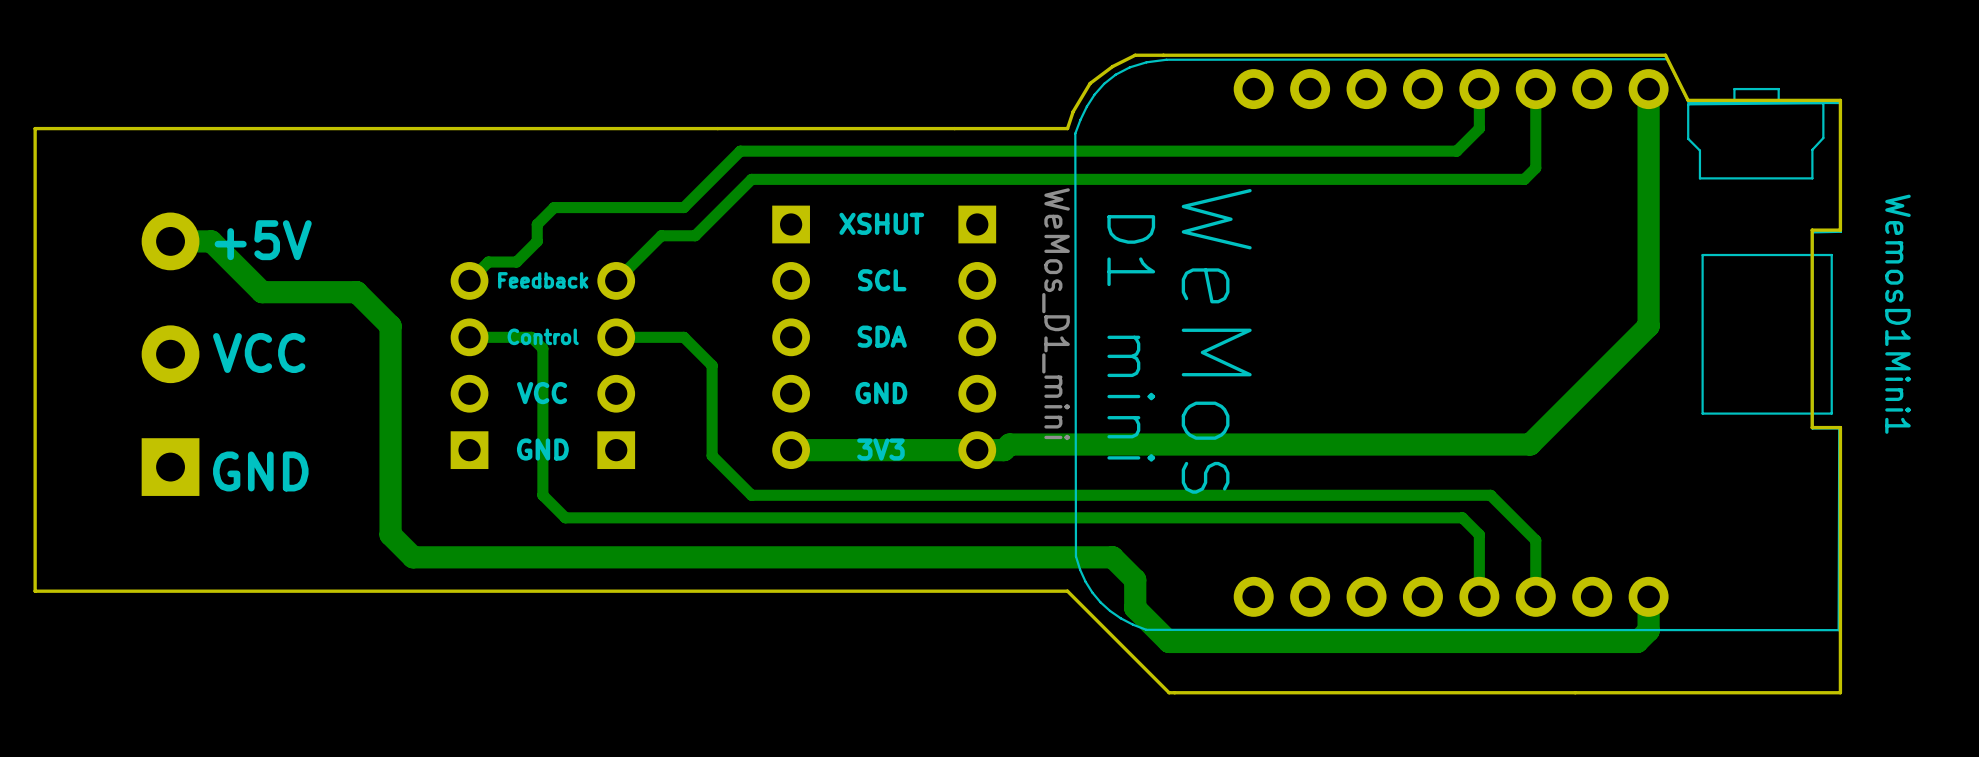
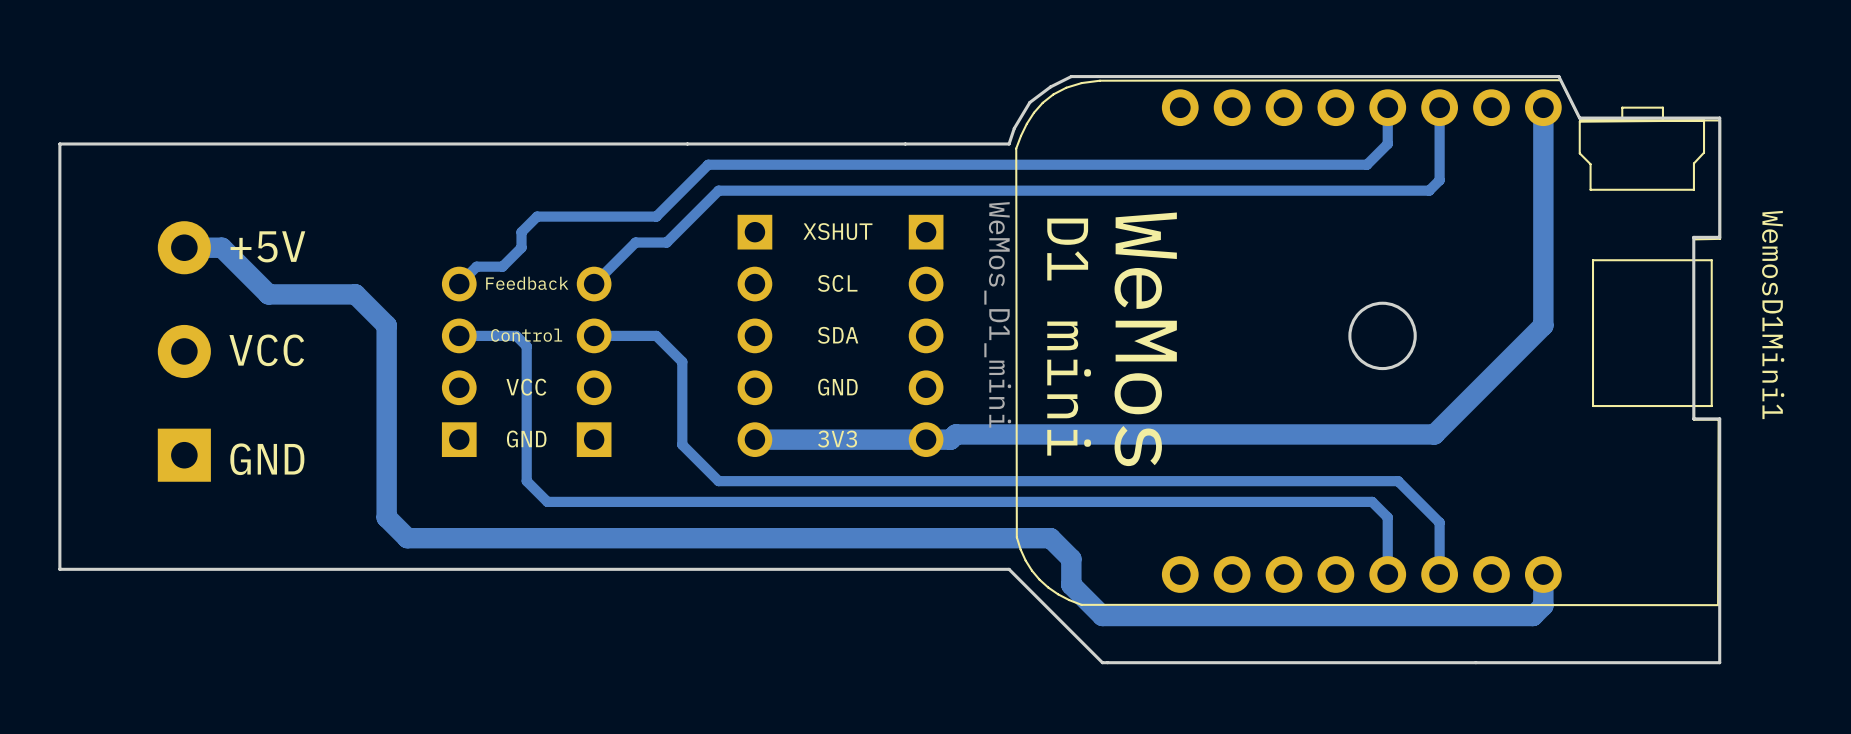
round board edge: none -> [1348, 301, 1417, 371]

